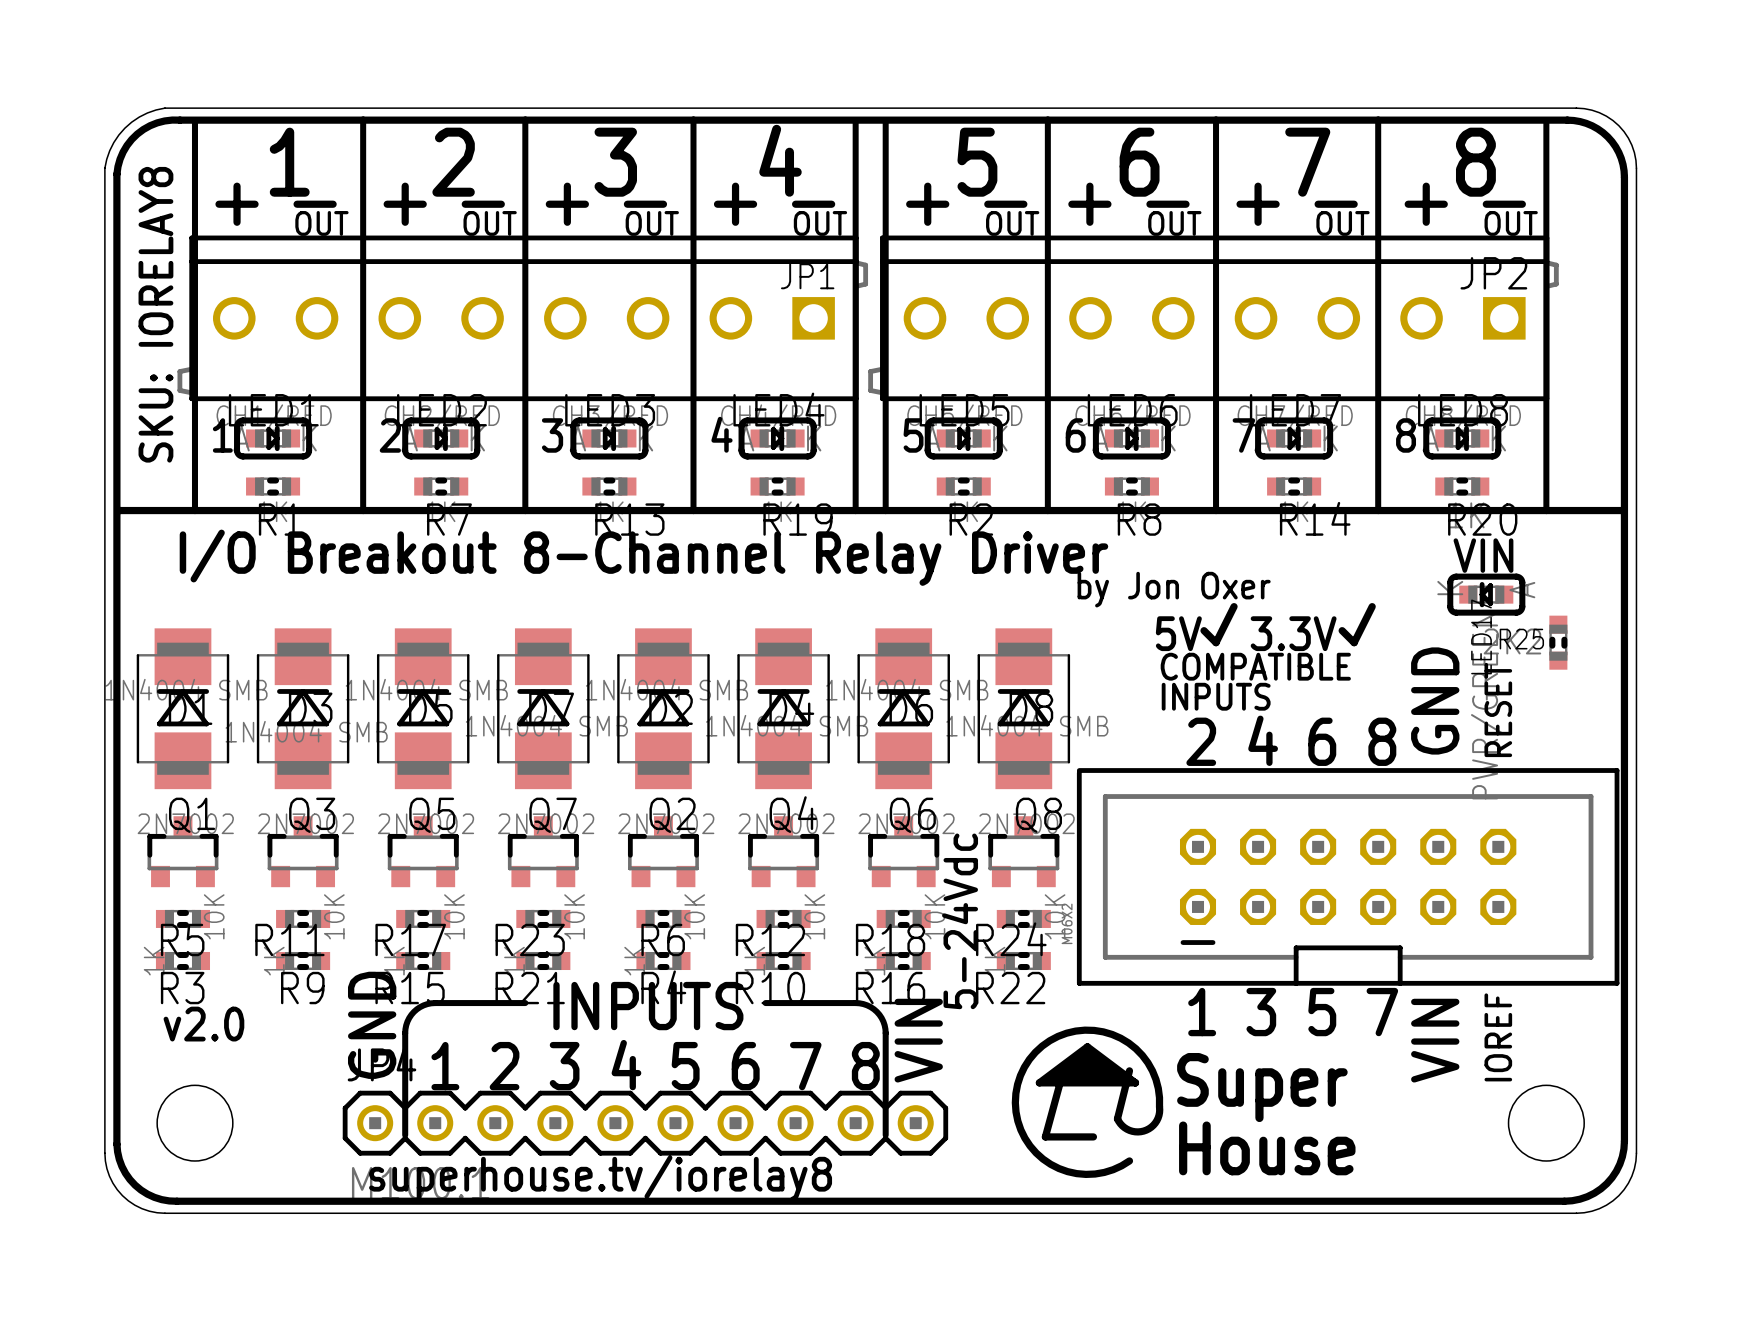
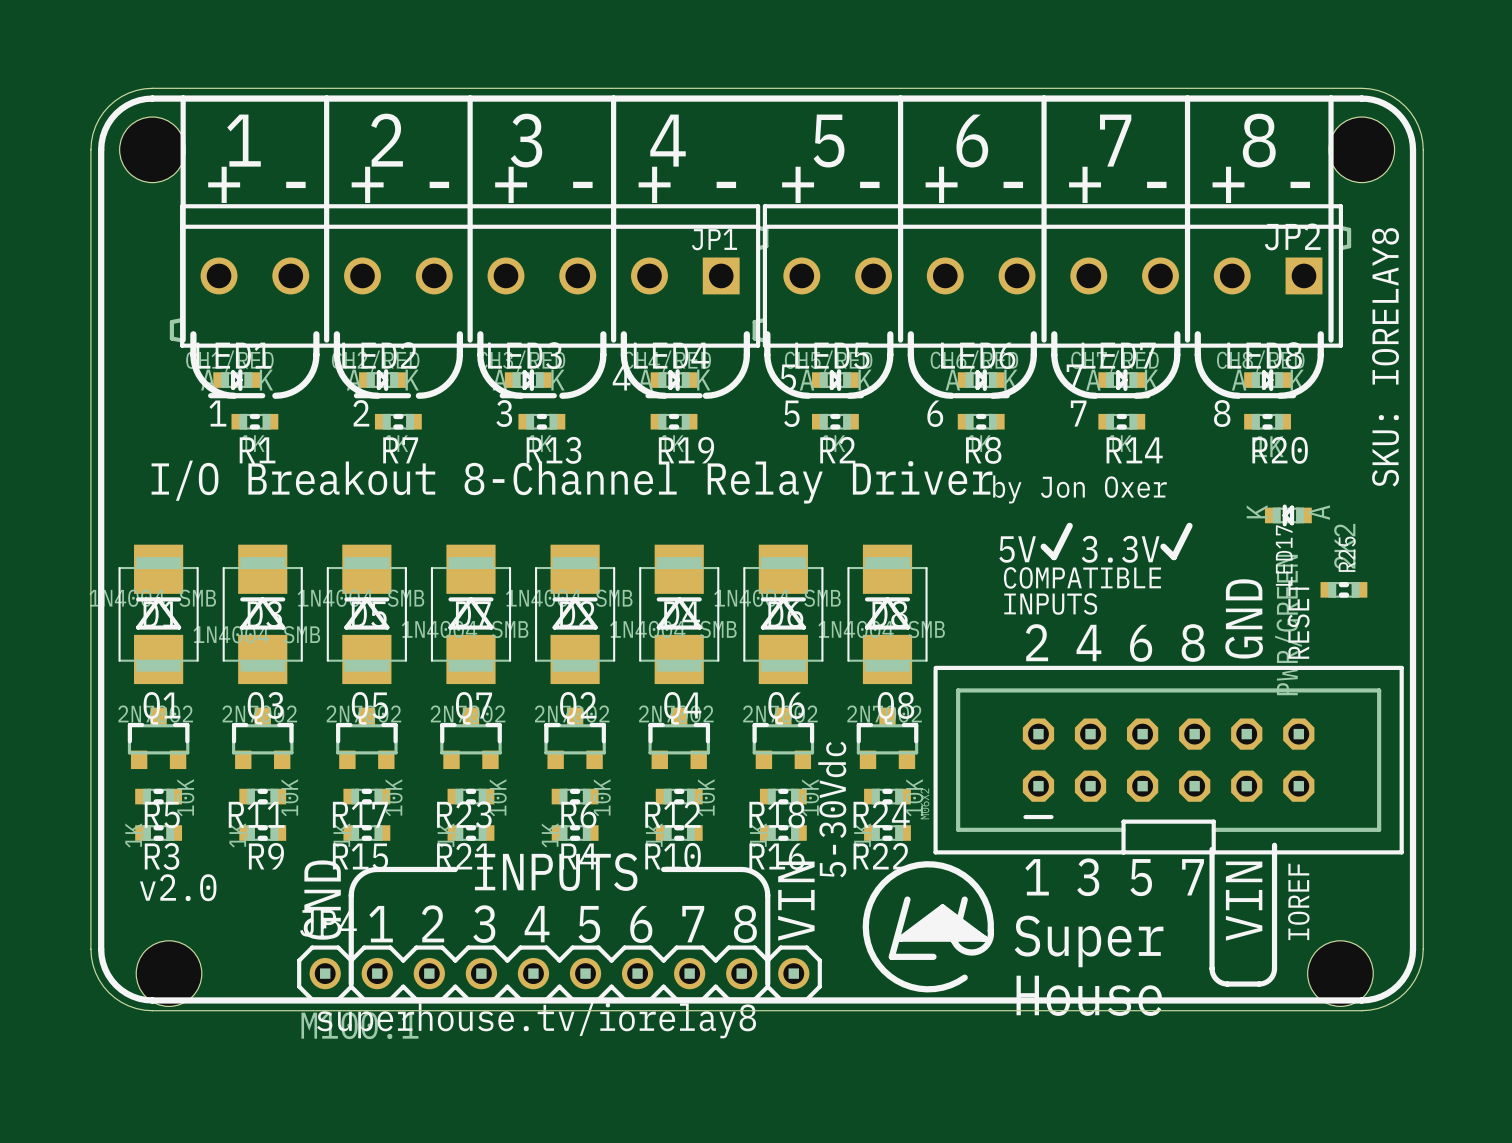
line: none -> (183, 98) (183, 340)
line: none -> (326, 98) (326, 340)
line: none -> (470, 98) (470, 340)
line: none -> (613, 98) (613, 340)
line: none -> (900, 98) (900, 340)
line: none -> (1044, 98) (1044, 340)
line: none -> (1187, 98) (1187, 340)
line: none -> (1331, 98) (1331, 340)
line: (179, 120) (1567, 120) (1586, 123) (1602, 132) (1618, 152) (1624, 177) (1624, 1141) (1622, 1156) (1612, 1177) (1600, 1188) (1587, 1196) (1564, 1201) (176, 1201) (161, 1199) (141, 1190) (129, 1179) (121, 1166) (116, 1144) (116, 174) (123, 152) (137, 134) (157, 122) (179, 120) -> (152, 98) (132, 102) (116, 113) (105, 130) (101, 149) (101, 949) (102, 962) (108, 974) (121, 989) (132, 996) (152, 1000) (1361, 1000) (1375, 998) (1387, 993) (1402, 980) (1409, 968) (1413, 949) (1413, 149) (1411, 138) (1405, 122) (1389, 106) (1373, 99) (1361, 98) (152, 98)
line: (363, 120) (363, 510) -> none
line: (525, 120) (525, 510) -> none
line: (693, 120) (693, 510) -> none
line: (1047, 120) (1047, 510) -> none
line: (1216, 120) (1216, 510) -> none
line: (1378, 120) (1378, 510) -> none
line: (194, 123) (194, 510) -> none
line: (855, 123) (855, 510) -> none
line: (885, 123) (885, 510) -> none
line: (1546, 123) (1546, 510) -> none
text position: 5 (977, 162) -> 5 (829, 141)
text position: 6 (1139, 162) -> 6 (972, 141)
text position: 7 (1307, 162) -> 7 (1115, 140)
text position: 8 (1475, 162) -> 8 (1259, 140)
board edge: (104, 172) (109, 150) (124, 128) (139, 117) (164, 108) (1576, 108) (1591, 110) (1606, 116) (1618, 125) (1628, 138) (1634, 152) (1636, 168) (1636, 1153) (1631, 1176) (1618, 1195) (1599, 1208) (1576, 1213) (164, 1213) (149, 1211) (134, 1205) (122, 1195) (112, 1183) (105, 1161) (104, 1095) -> (90, 149) (95, 126) (108, 106) (128, 93) (152, 88) (1361, 88) (1385, 93) (1405, 106) (1418, 126) (1423, 149) (1423, 949) (1421, 965) (1415, 979) (1405, 992) (1392, 1002) (1377, 1008) (1361, 1010) (152, 1010) (128, 1006) (108, 992) (95, 972) (90, 949)
hole: none -> (152, 149)
hole: none -> (1361, 149)
line: (237, 186) (237, 222) -> none
line: (405, 186) (405, 222) -> none
line: (567, 186) (567, 222) -> none
line: (735, 186) (735, 222) -> none
line: (927, 186) (927, 222) -> none
line: (1089, 186) (1089, 222) -> none
line: (1258, 186) (1258, 222) -> none
line: (1426, 186) (1426, 222) -> none
line: (219, 204) (255, 204) -> none
line: (297, 204) (333, 204) -> none
line: (387, 204) (423, 204) -> none
line: (465, 204) (501, 204) -> none
line: (549, 204) (585, 204) -> none
line: (627, 204) (663, 204) -> none
line: (717, 204) (753, 204) -> none
line: (795, 204) (831, 204) -> none
line: (909, 204) (945, 204) -> none
line: (987, 204) (1023, 204) -> none
line: (1071, 204) (1107, 204) -> none
line: (1149, 204) (1185, 204) -> none
line: (1240, 204) (1276, 204) -> none
line: (1318, 204) (1354, 204) -> none
line: (1408, 204) (1444, 204) -> none
line: (1486, 204) (1522, 204) -> none
text: none -> + (224, 184)
text: none -> - (295, 184)
text: none -> + (367, 184)
text: none -> - (439, 184)
text: none -> + (511, 184)
text: none -> - (582, 184)
text: none -> + (654, 184)
text: none -> - (726, 184)
text: none -> + (798, 184)
text: none -> - (869, 184)
text: none -> + (941, 184)
text: none -> - (1013, 184)
text: none -> + (1085, 184)
text: none -> - (1156, 184)
text: none -> + (1228, 184)
text: OUT (321, 223) -> none
text: OUT (490, 223) -> none
text: OUT (652, 223) -> none
text: OUT (820, 223) -> none
text: OUT (1012, 223) -> none
text: OUT (1174, 223) -> none
text: OUT (1342, 223) -> none
text: OUT (1511, 223) -> - (1300, 184)
text: SKU: IORELAY8 (155, 314) -> none
JP1 position: (522, 318) -> (469, 275)
line: none -> (193, 334) (193, 360) (198, 375) (213, 390) (234, 395)
line: none -> (316, 334) (316, 360) (310, 375) (295, 390) (275, 395)
line: none -> (336, 334) (337, 360) (342, 375) (357, 390) (377, 395)
line: none -> (459, 334) (459, 360) (454, 375) (439, 390) (418, 395)
line: none -> (480, 334) (480, 360) (485, 375) (500, 390) (521, 395)
line: none -> (603, 334) (603, 360) (597, 375) (582, 390) (562, 395)
line: none -> (623, 334) (624, 360) (629, 375) (644, 390) (664, 395)
line: none -> (746, 334) (746, 360) (741, 375) (726, 390) (705, 395)
line: none -> (767, 334) (767, 360) (772, 375) (787, 390) (808, 395)
line: none -> (890, 334) (889, 360) (884, 375) (869, 390) (849, 395)
line: none -> (910, 334) (911, 360) (916, 375) (931, 390) (951, 395)
line: none -> (1033, 334) (1033, 360) (1028, 375) (1013, 390) (992, 395)
line: none -> (1177, 334) (1176, 360) (1171, 375) (1156, 390) (1136, 395)
line: none -> (1197, 334) (1198, 360) (1203, 375) (1218, 390) (1238, 395)
line: none -> (1320, 334) (1320, 360) (1315, 375) (1300, 390) (1279, 395)
text: none -> SKU: IORELAY8 (1385, 357)
text position: 1 (222, 435) -> 1 (217, 413)
text position: 2 (390, 435) -> 2 (361, 413)
text position: 3 (552, 435) -> 3 (504, 413)
text position: 6 (1075, 435) -> 6 (935, 413)
text position: 8 (1406, 435) -> 8 (1222, 413)
line: (243, 456) (238, 454) (237, 450) (237, 425) (243, 420) (306, 421) (309, 425) (309, 451) (303, 456) -> none
line: (411, 456) (406, 454) (405, 450) (405, 425) (411, 420) (474, 421) (477, 425) (477, 451) (471, 456) -> none
line: (579, 456) (575, 454) (573, 450) (573, 424) (579, 420) (642, 421) (645, 425) (645, 451) (639, 456) -> none
line: (747, 456) (743, 454) (741, 450) (741, 424) (747, 420) (810, 421) (813, 425) (813, 451) (807, 456) -> none
line: (933, 456) (929, 454) (927, 450) (927, 425) (933, 420) (996, 421) (999, 425) (999, 451) (993, 456) -> none
line: (1101, 456) (1097, 454) (1095, 450) (1095, 425) (1101, 420) (1164, 421) (1167, 425) (1167, 451) (1161, 456) -> none
line: (1264, 456) (1259, 454) (1258, 450) (1258, 424) (1264, 420) (1327, 421) (1330, 425) (1330, 451) (1324, 456) -> (1095, 395) (1074, 390) (1059, 375) (1054, 360) (1054, 334)
line: (1432, 456) (1428, 454) (1426, 450) (1426, 425) (1432, 420) (1495, 421) (1498, 425) (1498, 451) (1492, 456) -> none
text: none -> 5 (791, 413)
text: none -> 7 (1078, 413)
R1 position: (273, 486) -> (254, 421)
R7 position: (441, 486) -> (398, 421)
R13 position: (609, 486) -> (541, 421)
line: (119, 510) (1624, 510) -> none
text: VIN (1483, 555) -> none
line: (1456, 576) (1519, 577) (1522, 581) (1521, 609) (1516, 612) (1453, 611) (1450, 607) (1450, 581) (1456, 576) -> none
text position: by Jon Oxer (1174, 589) -> by Jon Oxer (1079, 489)
R25 rotation: 0° (1558, 642) -> 90° clockwise (1343, 589)
R25 position: (1558, 642) -> (1343, 589)
text: 5-24Vdc (960, 921) -> 5-30Vdc (832, 809)
line: none -> (1274, 845) (1274, 970) (1270, 979) (1259, 984) (1223, 983) (1216, 979) (1213, 974) (1212, 849)
line: (1063, 1070) (1045, 1136) (1093, 1136) -> (907, 899) (891, 956) (933, 956)
line: (1129, 1070) (1117, 1118) (1122, 1125) (1129, 1130) (1143, 1131) (1155, 1123) (1159, 1112) (1158, 1088) (1152, 1070) (1142, 1055) (1128, 1042) (1103, 1031) (1084, 1030) (1066, 1033) (1042, 1046) (1024, 1067) (1017, 1084) (1015, 1102) (1020, 1129) (1030, 1145) (1043, 1159) (1058, 1168) (1076, 1173) (1095, 1174) (1113, 1169) (1129, 1160) -> (964, 899) (954, 941) (964, 951) (977, 951) (987, 944) (990, 935) (989, 914) (984, 899) (975, 886) (964, 875) (942, 865) (926, 864) (910, 866) (889, 878) (873, 896) (867, 911) (865, 927) (870, 950) (878, 964) (889, 976) (903, 984) (918, 988) (935, 988) (950, 985) (964, 977)

